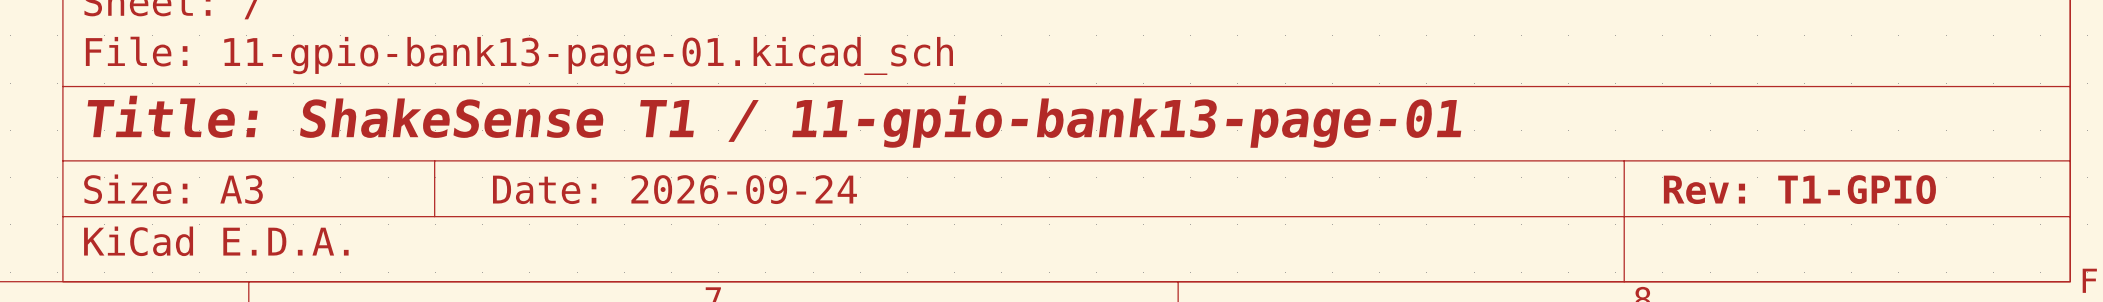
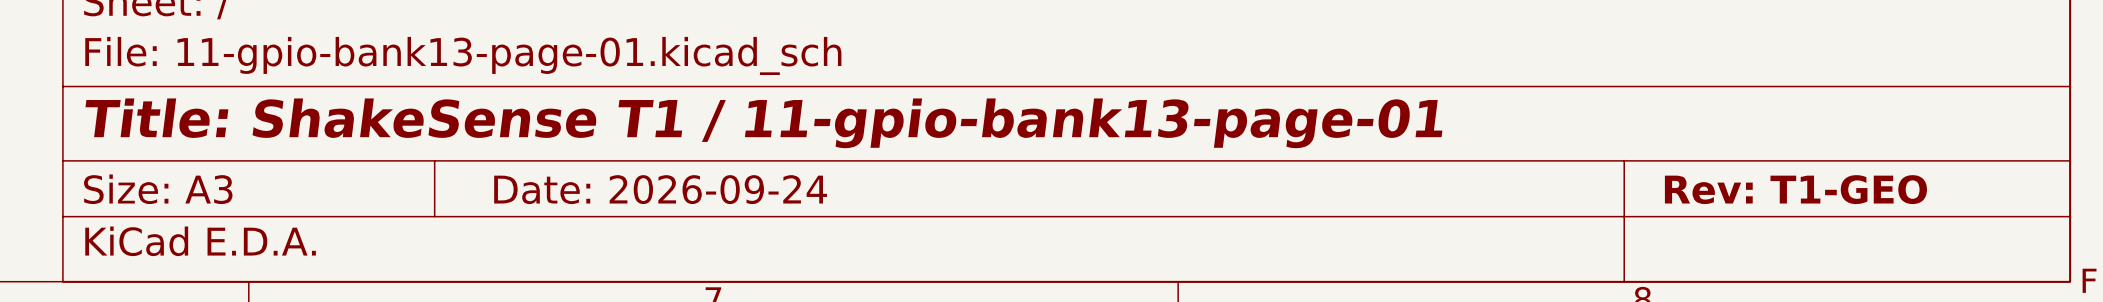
title block: Rev: T1-GPIO (1799, 189) -> Rev: T1-GEO (1795, 189)

